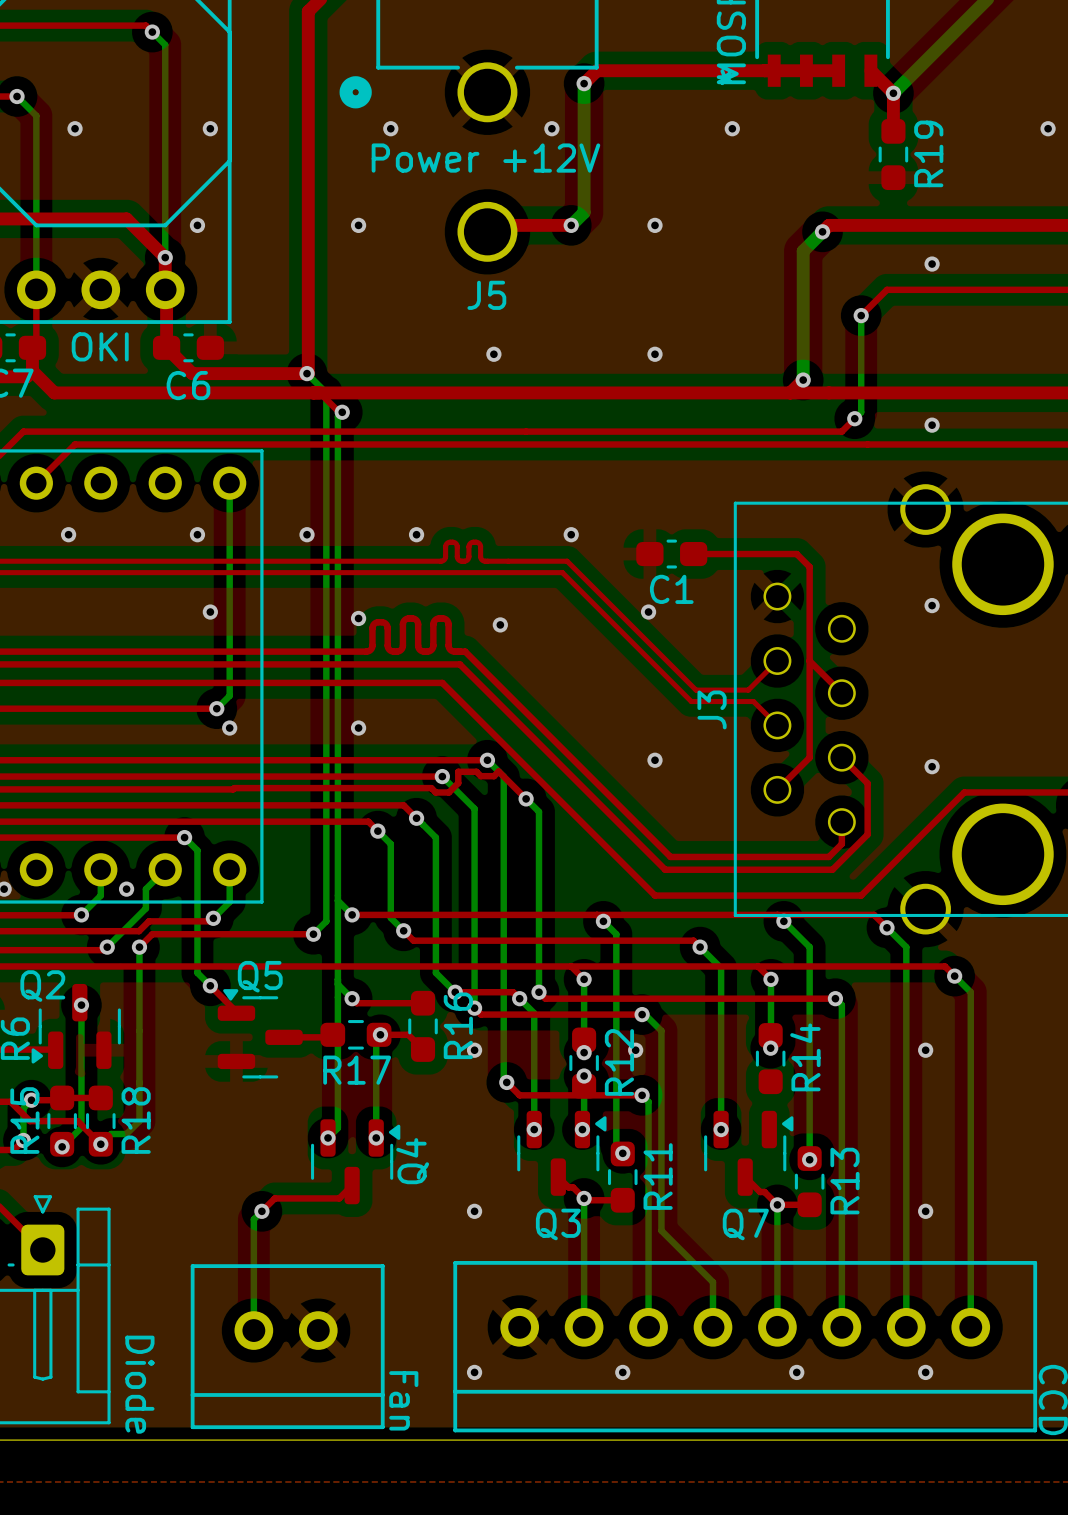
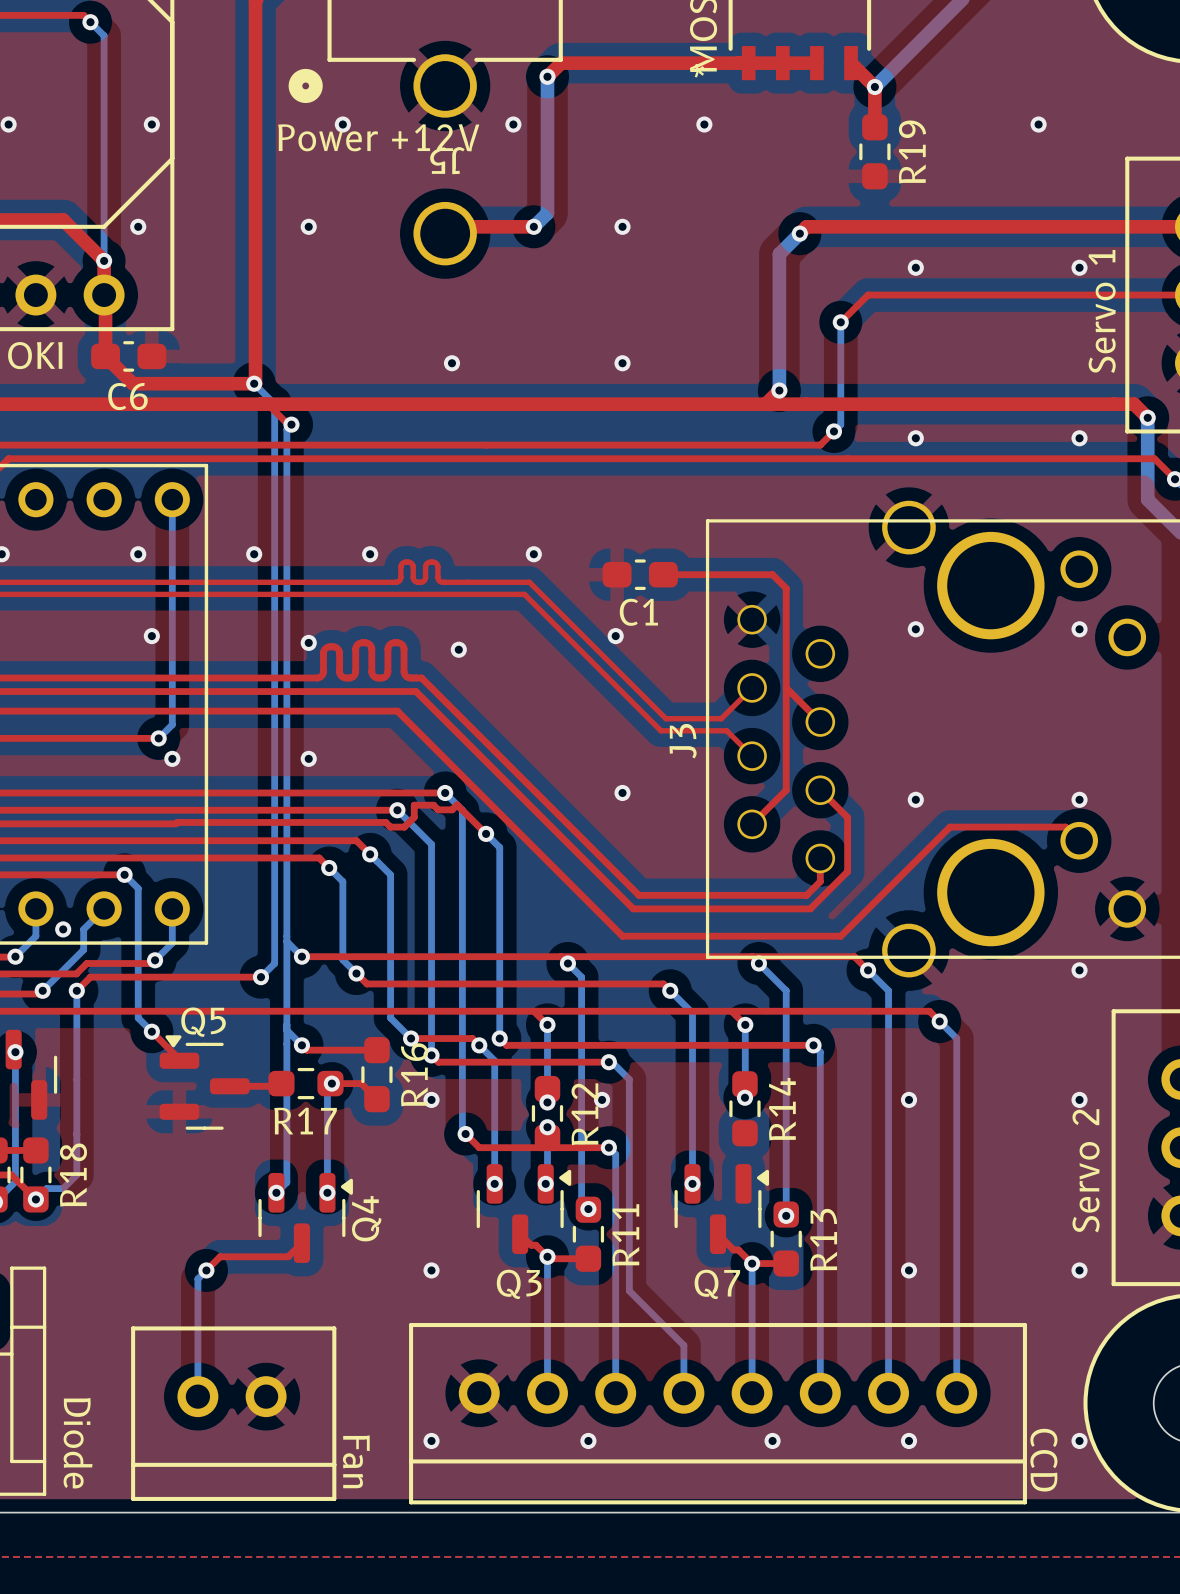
text position: Power +12V (485, 158) -> Power +12V (378, 137)
J5 name rotation: 0° (486, 295) -> 180° (447, 160)
J5 name position: J5 (486, 295) -> J5 (447, 160)

